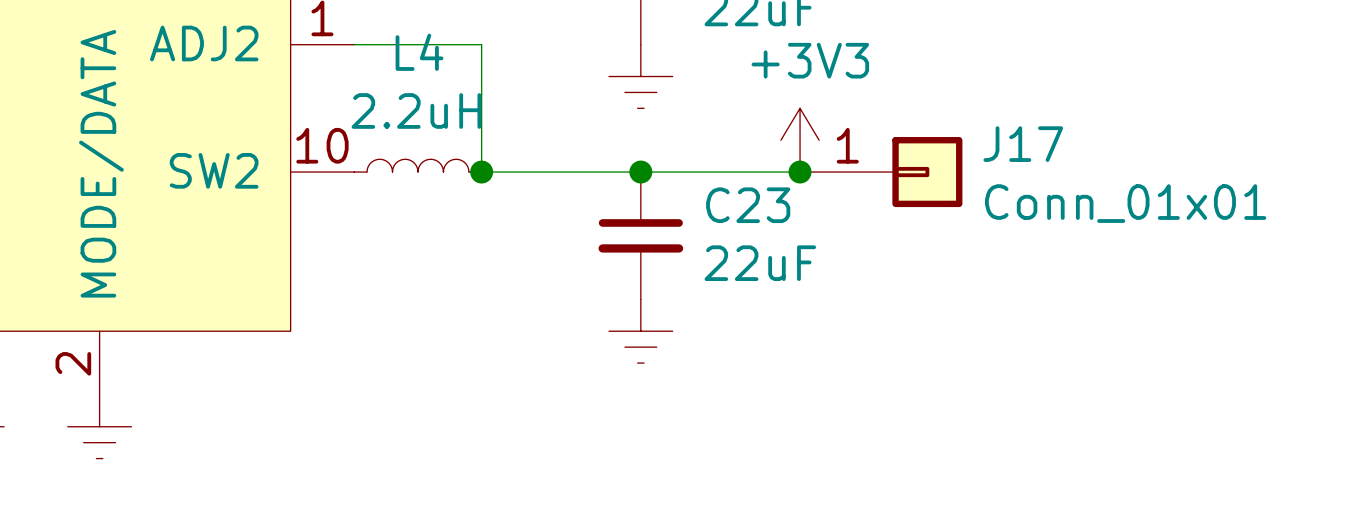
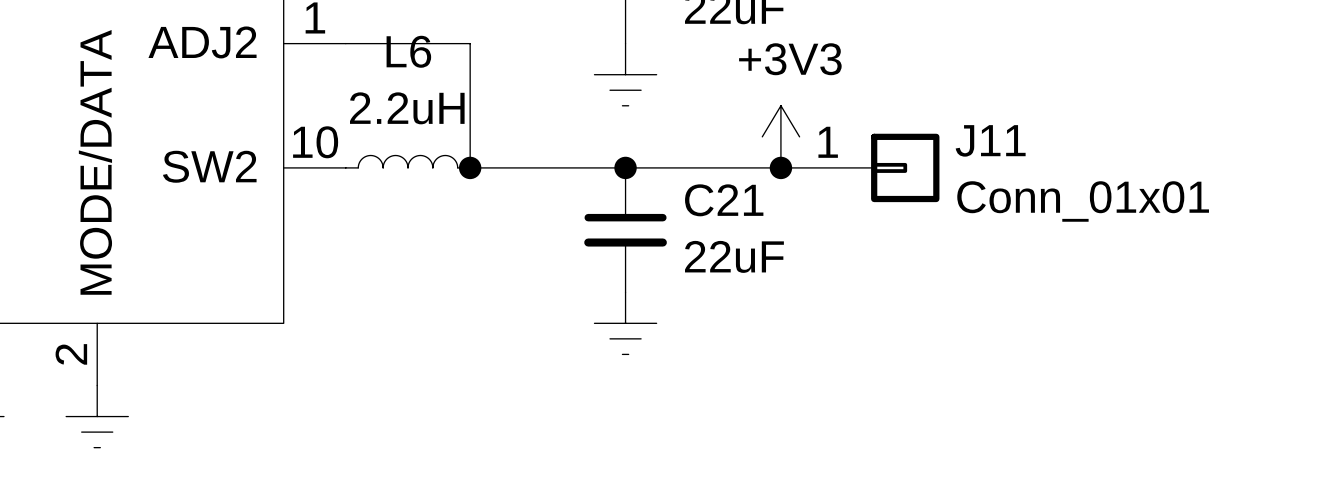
L4 name: L4 (419, 52) -> L6 (408, 51)
J17 name: J17 (1023, 144) -> J11 (990, 140)
C23 name: C23 (748, 205) -> C21 (724, 200)

